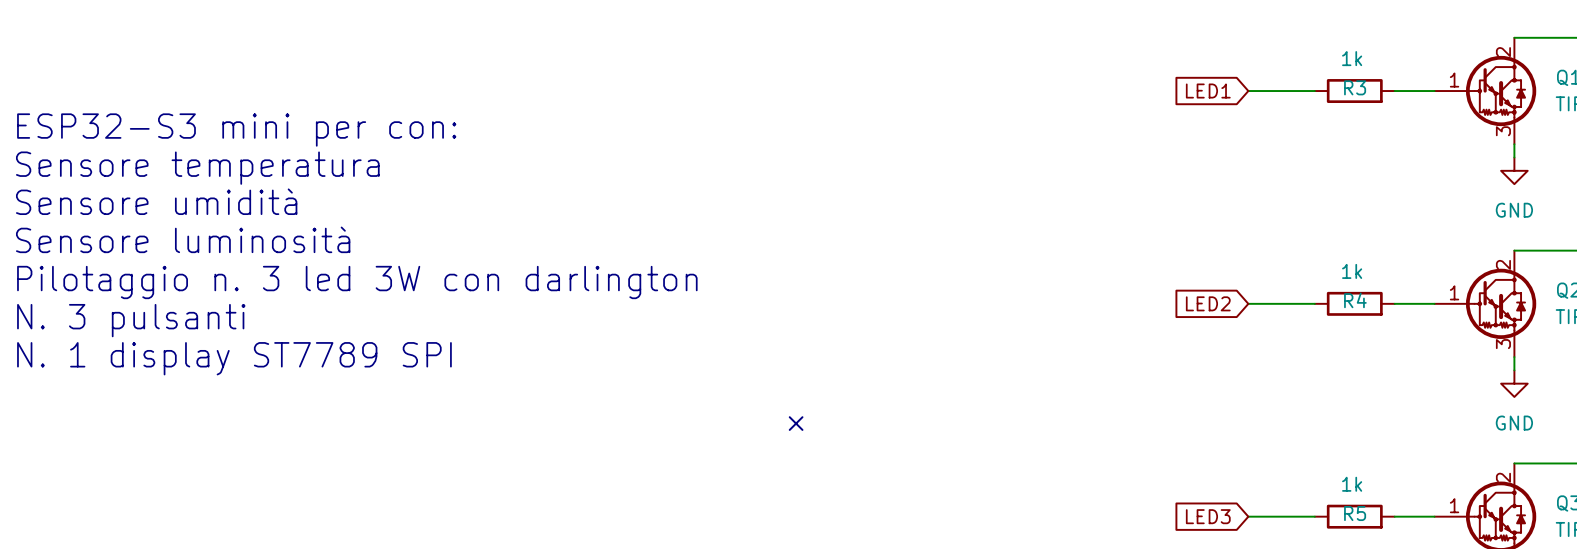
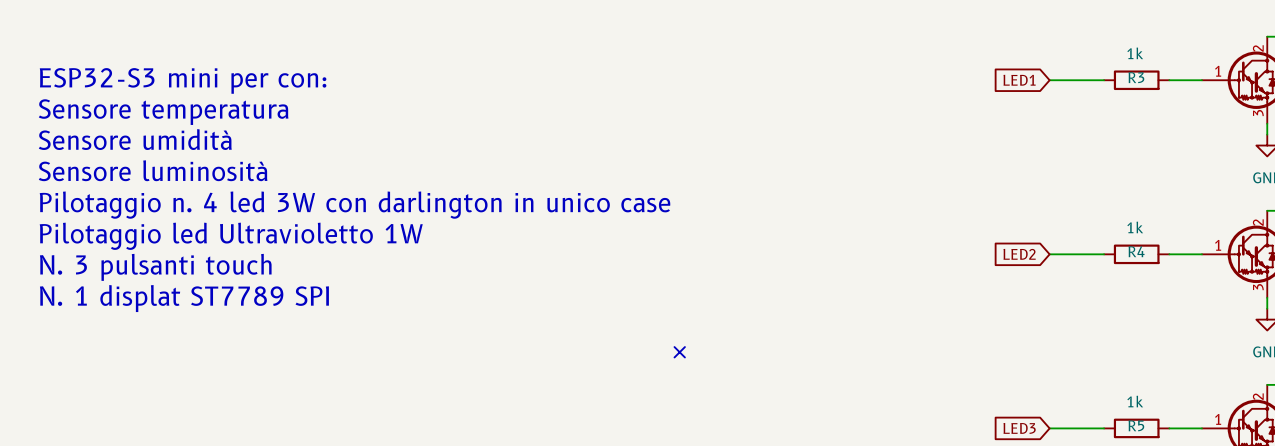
text: none -> ESP32-S3 mini per con: (183, 80)
text: ESP32-S3 mini per con: (236, 130) -> Sensore temperatura (163, 112)
text: Sensore temperatura (197, 168) -> Sensore umidità (135, 139)
text: Sensore umidità (156, 201) -> Sensore luminosità (153, 170)
text: Sensore luminosità (183, 239) -> Pilotaggio n. 4 led 3W con darlington in unico case (355, 205)
text: Pilotaggio n. 3 led 3W con darlington (357, 282) -> Pilotaggio led Ultravioletto 1W (231, 236)
text: N. 3 pulsanti (131, 320) -> N. 3 pulsanti touch (155, 267)
text: N. 1 display ST7789 SPI (234, 358) -> N. 1 displat ST7789 SPI (184, 298)

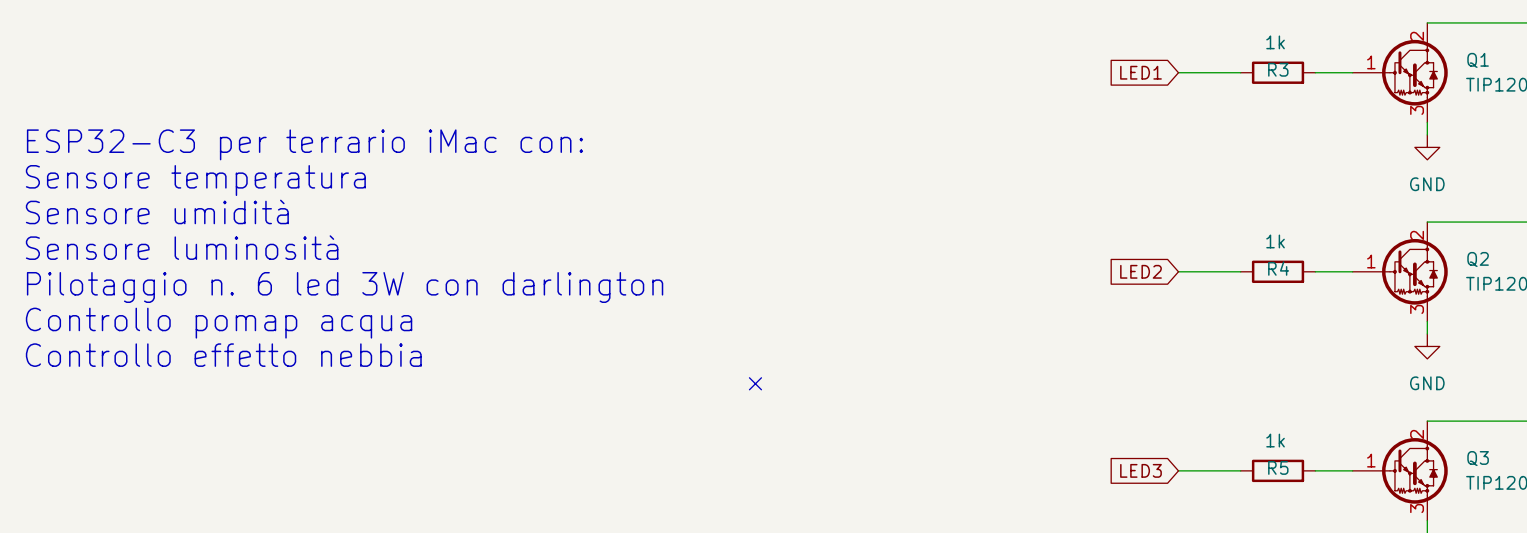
text: ESP32-S3 mini per con: (183, 80) -> none
text: Sensore temperatura (163, 112) -> none
text: Sensore umidità (135, 139) -> ESP32-C3 per terrario iMac con: (304, 144)
text: Sensore luminosità (153, 170) -> Sensore temperatura (195, 180)
text: Pilotaggio n. 4 led 3W con darlington in unico case (355, 205) -> Sensore umidità (157, 211)
text: Pilotaggio led Ultravioletto 1W (231, 236) -> Sensore luminosità (182, 247)
text: N. 3 pulsanti touch (155, 267) -> Pilotaggio n. 6 led 3W con darlington (345, 287)
text: N. 1 displat ST7789 SPI (184, 298) -> Controllo pomap acqua (219, 323)
text: none -> Controllo effetto nebbia (223, 355)

